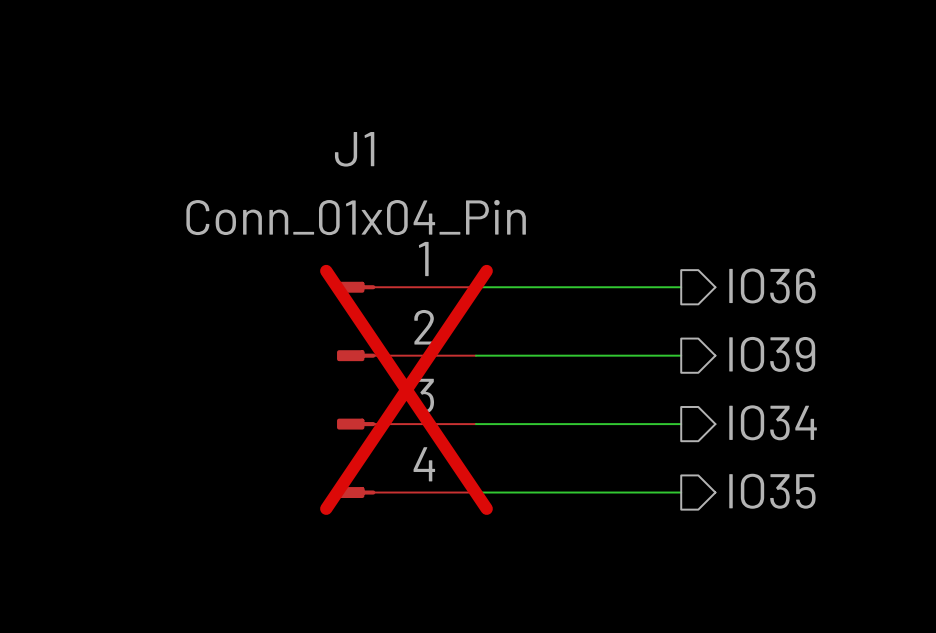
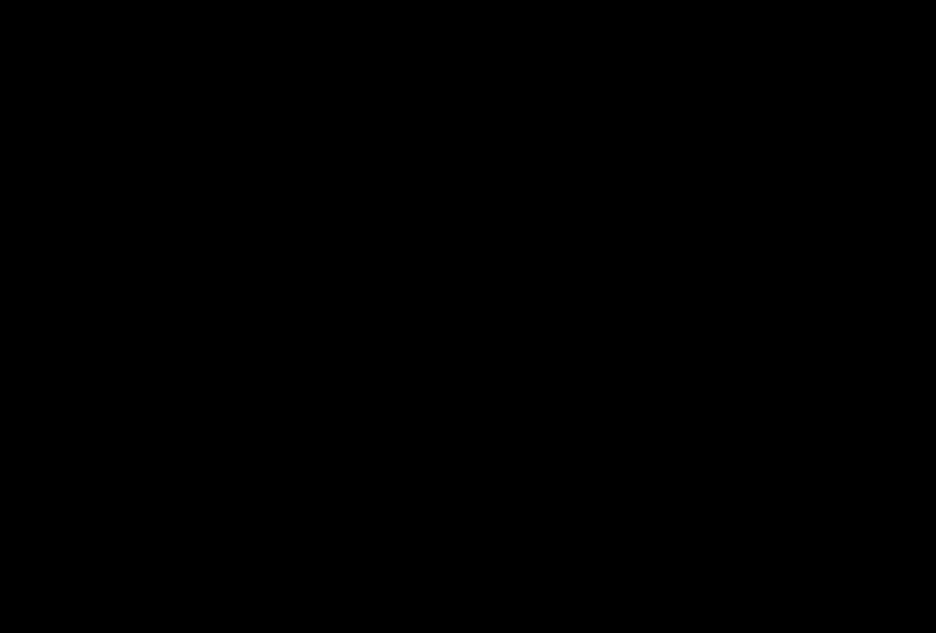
hierarchical label: IO36 (772, 285) -> none
wire: (475, 287) (681, 287) -> none
hierarchical label: IO39 (772, 354) -> none
wire: (475, 355) (681, 355) -> none
J1: Conn_01x04_Pin (406, 389) -> none
hierarchical label: IO34 (773, 422) -> none
wire: (475, 424) (681, 424) -> none
hierarchical label: IO35 (772, 491) -> none
wire: (475, 492) (681, 492) -> none

